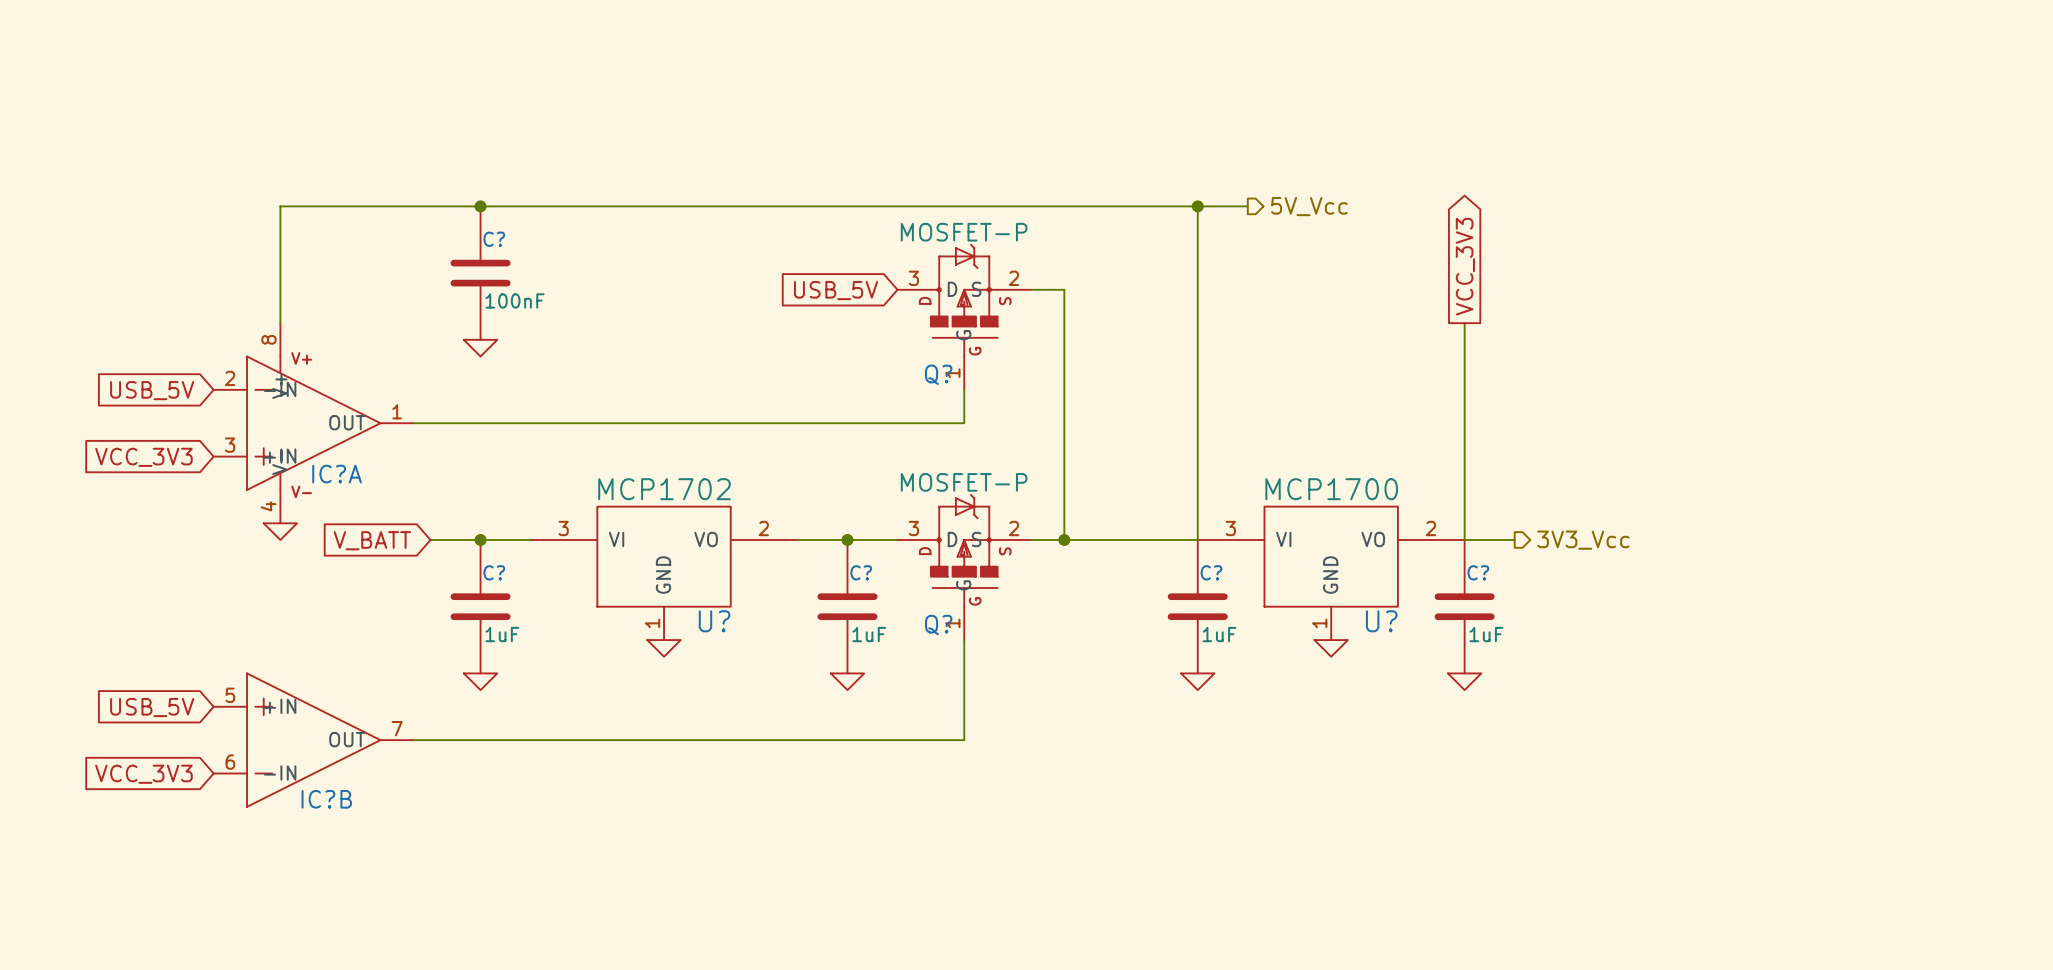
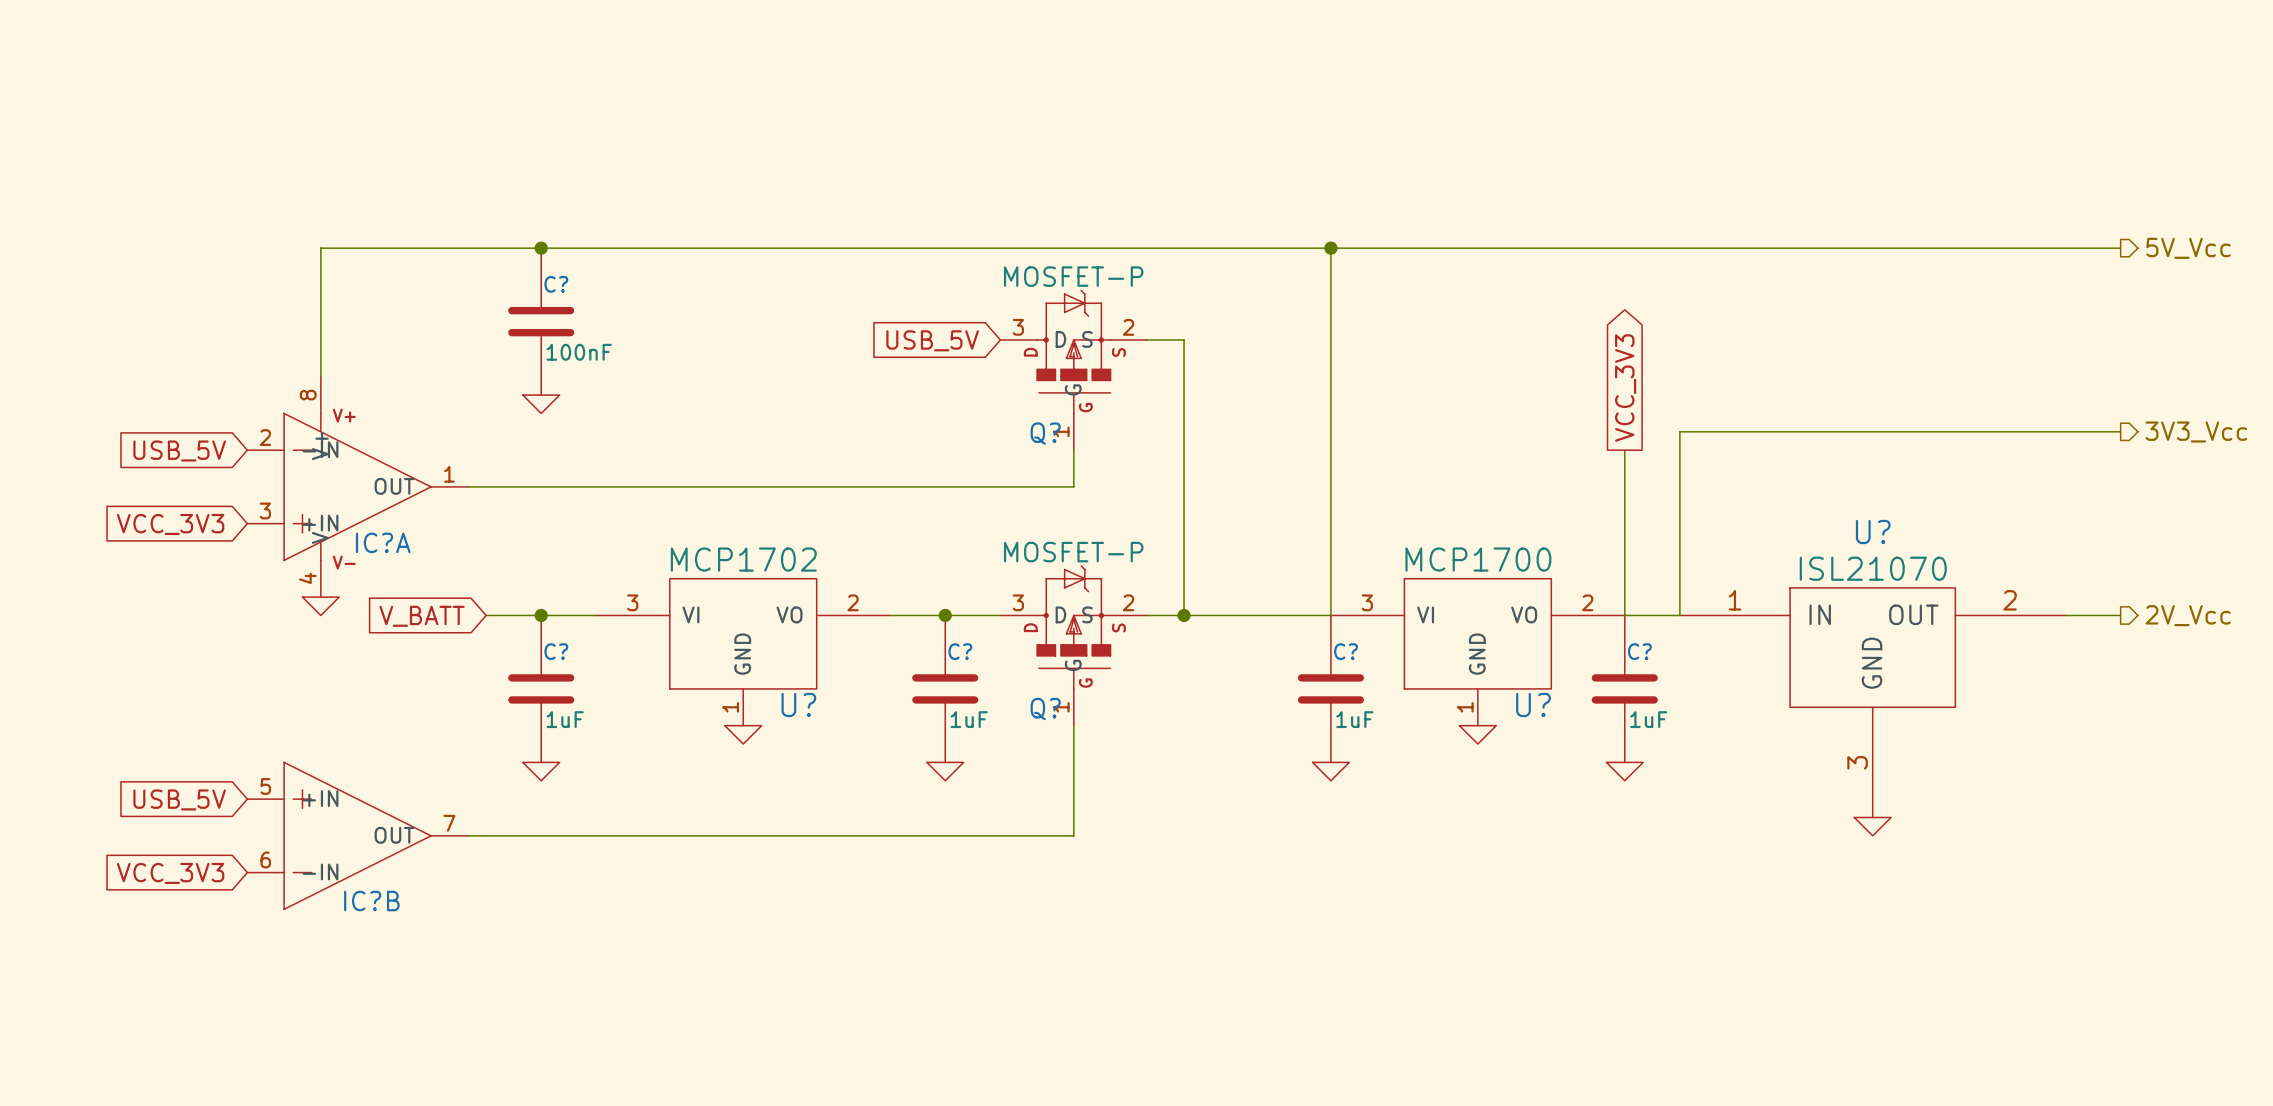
wire: none -> (1386, 248) (2120, 248)
hierarchical label: 5V_Vcc (1309, 206) -> none
hierarchical label: none -> 5V_Vcc (2188, 248)
global label position: VCC_3V3 (1465, 266) -> VCC_3V3 (1625, 388)
wire: (1464, 323) (1464, 389) -> none
wire: none -> (2120, 431) (1679, 431) (1679, 615)
hierarchical label: none -> 3V3_Vcc (2196, 431)
wire: none -> (2065, 615) (2120, 615)
hierarchical label: 3V3_Vcc (1583, 540) -> none
hierarchical label: none -> 2V_Vcc (2188, 615)
U?: none -> ISL21070 (1872, 702)
power symbol: none -> (1872, 826)

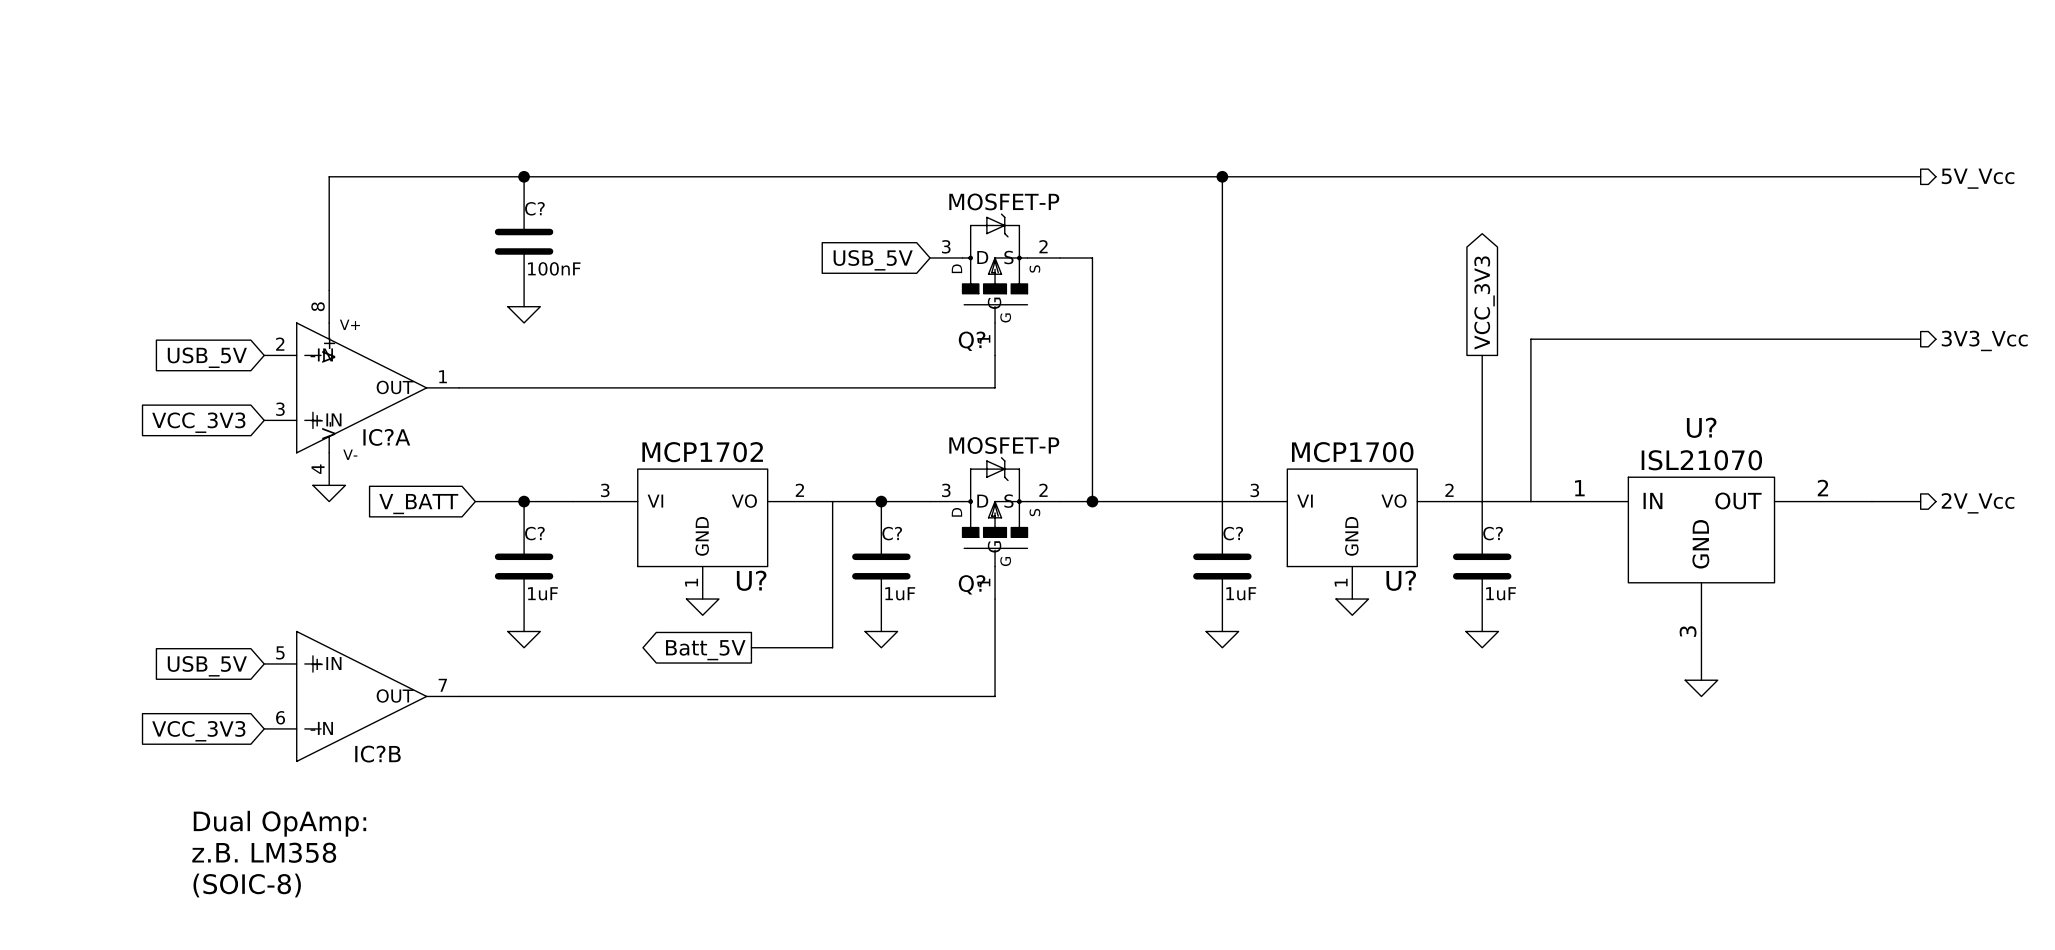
wire: none -> (832, 501) (832, 647) (751, 647)
global label: none -> Batt_5V (705, 650)
text: none -> Dual OpAmp: (279, 823)
text: none -> z.B. LM358 (264, 852)
text: none -> (SOIC-8) (247, 885)

